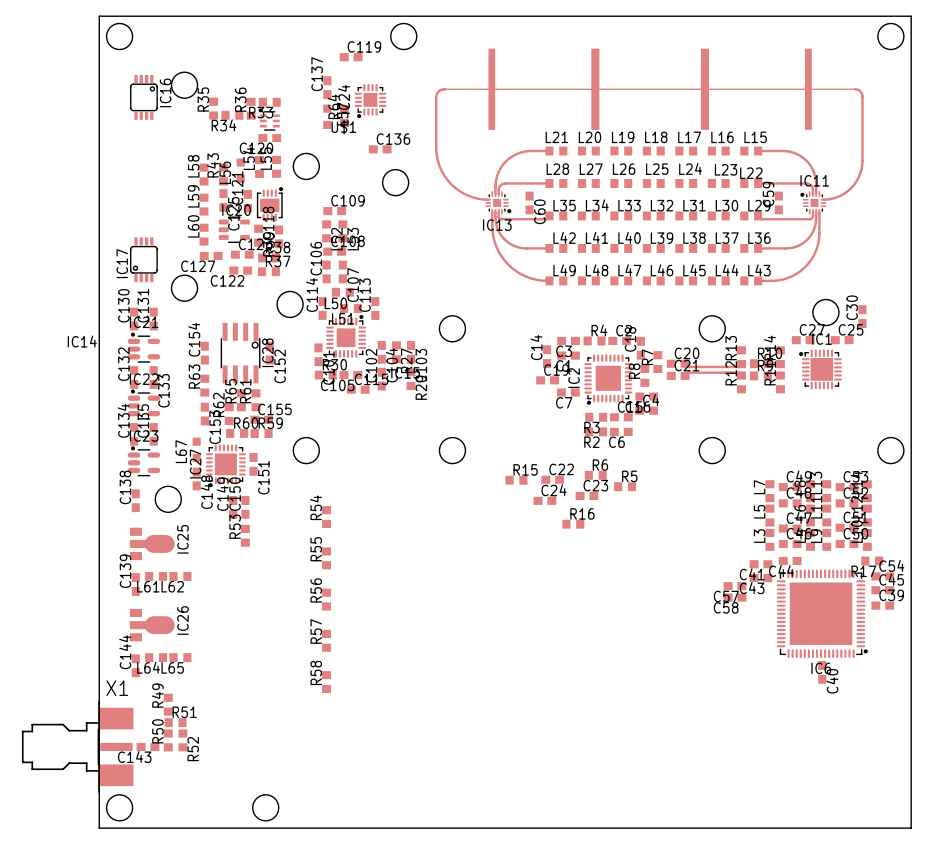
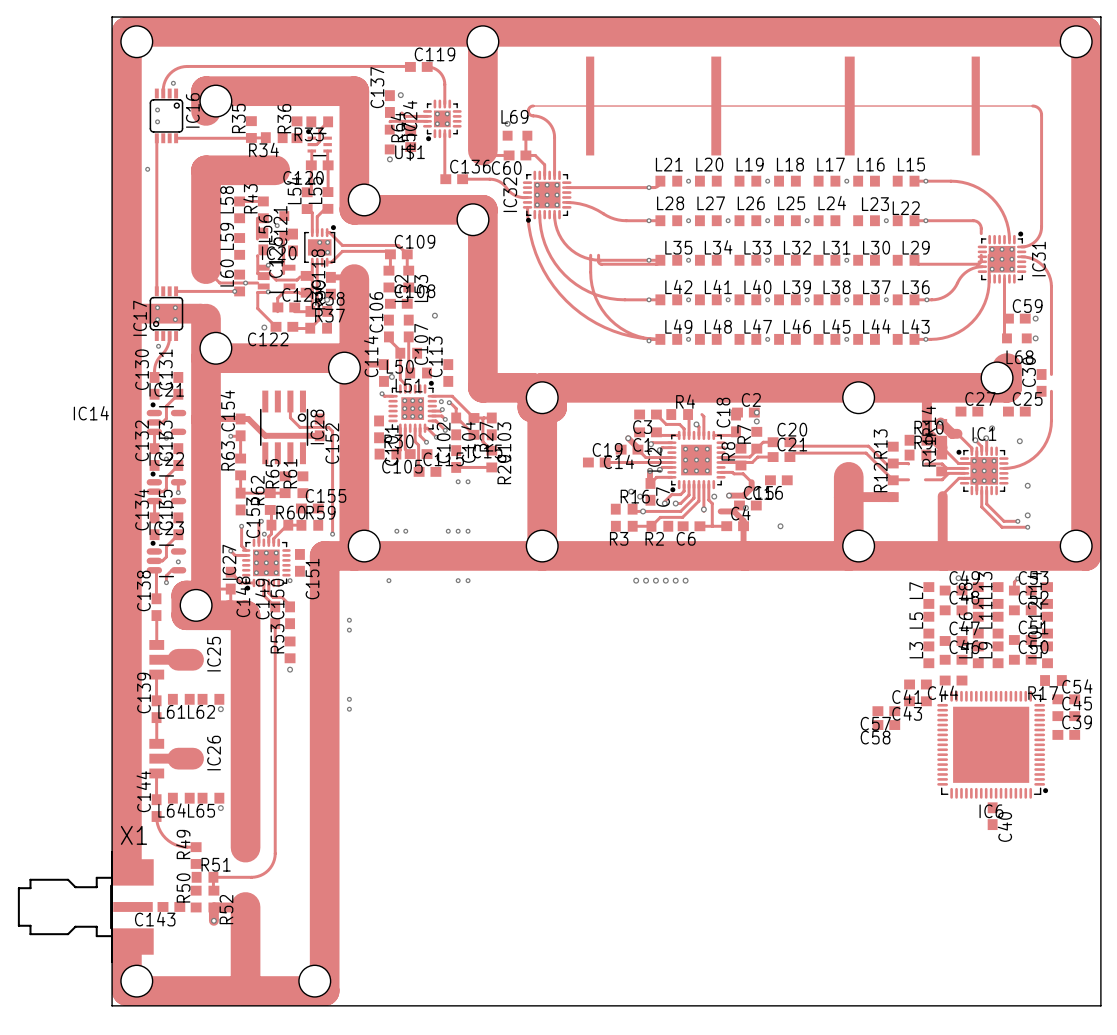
track: none -> (482, 31) (482, 150) (487, 155) (509, 155)
track: none -> (410, 66) (184, 66) (175, 69) (168, 75) (164, 84) (163, 93)
track: none -> (427, 66) (437, 70) (443, 77) (444, 104)
via: none -> (173, 83)
via: none -> (400, 95)
track: (445, 89) (438, 91) (436, 97) (436, 152) (440, 167) (448, 180) (459, 190) (473, 197) (488, 199) -> (533, 106) (528, 109) (529, 113) (546, 120) (553, 131) (554, 175)
via: none -> (157, 109)
track: none -> (206, 110) (206, 91) (354, 91) (354, 209) (482, 209) (482, 387) (532, 387) (532, 407) (552, 407) (552, 387)
track: none -> (401, 112) (405, 116) (427, 116)
via: none -> (437, 113)
via: none -> (447, 113)
track: none -> (427, 121) (389, 121)
via: none -> (157, 121)
track: none -> (328, 121) (319, 130) (319, 141) (316, 144) (311, 144)
via: none -> (437, 123)
via: none -> (447, 123)
via: none -> (507, 123)
track: none -> (444, 133) (445, 179)
L69: none -> (517, 135)
track: none -> (527, 135) (525, 155) (535, 155) (544, 164) (544, 175)
track: none -> (156, 138) (156, 291)
track: none -> (265, 137) (176, 138)
track: none -> (311, 151) (311, 190) (308, 192)
track: none -> (327, 151) (328, 189) (324, 192)
via: none -> (389, 159)
via: none -> (147, 169)
track: none -> (275, 170) (206, 170) (206, 269) (219, 283) (257, 283)
track: none -> (462, 179) (494, 179) (501, 182) (513, 194) (527, 197)
track: (549, 150) (523, 151) (508, 158) (497, 174) (495, 194) -> (660, 181) (659, 185) (654, 187) (566, 187)
via: none -> (688, 181)
via: none -> (767, 181)
via: none -> (846, 181)
via: none -> (925, 181)
track: (782, 150) (797, 154) (808, 163) (815, 176) (816, 194) -> (944, 181) (967, 183) (988, 194) (996, 202) (1004, 217) (1009, 239)
via: none -> (537, 185)
via: none -> (547, 185)
via: none -> (557, 185)
via: none -> (649, 187)
track: (862, 160) (860, 173) (851, 188) (836, 197) (823, 199) -> (1041, 192) (1040, 234) (1031, 244) (1021, 246)
via: none -> (537, 195)
via: none -> (547, 195)
via: none -> (557, 195)
IC32: none -> (547, 196)
track: none -> (235, 200) (257, 201)
L56 position: (240, 170) -> (284, 225)
via: none -> (537, 204)
via: none -> (547, 204)
via: none -> (557, 204)
track: none -> (527, 207) (530, 235) (539, 262) (553, 286) (566, 300) (580, 313) (604, 327) (631, 336) (659, 339)
track: none -> (308, 209) (312, 212) (312, 232)
track: none -> (324, 209) (317, 216) (317, 232)
track: none -> (554, 214) (557, 229) (561, 238) (567, 246) (580, 255) (595, 259) (660, 260)
track: none -> (257, 218) (257, 239)
track: (521, 183) (502, 183) (499, 187) (498, 194) -> (626, 220) (610, 217) (585, 205) (566, 202)
via: none -> (649, 220)
via: none -> (688, 220)
via: none -> (728, 220)
via: none -> (767, 220)
via: none -> (807, 220)
via: none -> (886, 220)
via: none -> (925, 220)
via: none -> (277, 225)
track: none -> (327, 232) (329, 232) (342, 245) (398, 245) (407, 254) (408, 270)
track: none -> (284, 235) (283, 273)
via: none -> (319, 242)
via: none -> (327, 242)
IC13: (498, 202) -> none
C60 rotation: 0° (529, 202) -> 90° clockwise (517, 155)
C60 position: (529, 202) -> (517, 155)
C59 rotation: 0° (778, 202) -> 90° clockwise (1016, 318)
C59 position: (778, 202) -> (1016, 318)
IC11: (813, 202) -> none
via: none -> (992, 249)
via: none -> (1002, 249)
via: none -> (1011, 249)
via: none -> (327, 252)
track: (495, 211) (496, 225) (501, 236) (514, 246) (526, 248) -> (539, 214) (544, 243) (551, 257) (564, 274) (582, 288) (595, 294) (610, 298) (632, 299)
track: (816, 211) (813, 229) (804, 242) (790, 248) (772, 248) -> (982, 266) (973, 268) (965, 273) (947, 295) (931, 299)
track: none -> (257, 255) (257, 273) (269, 273) (276, 280) (297, 280) (300, 276)
IC31: none -> (1002, 257)
track: none -> (1021, 256) (1029, 257) (1039, 262) (1047, 271) (1050, 278) (1051, 374)
via: none -> (649, 260)
via: none -> (688, 260)
via: none -> (767, 260)
via: none -> (846, 260)
via: none -> (992, 259)
via: none -> (1002, 259)
via: none -> (1011, 259)
track: none -> (312, 262) (312, 309) (310, 311) (294, 311)
track: none -> (317, 262) (318, 320) (310, 328) (294, 328)
track: none -> (327, 262) (331, 262) (342, 251) (387, 251) (390, 254) (388, 270)
via: none -> (268, 265)
via: none -> (992, 269)
via: none -> (1002, 269)
via: none -> (1011, 269)
track: none -> (330, 277) (352, 277) (354, 279) (354, 555)
track: none -> (1004, 278) (1004, 335) (1006, 338)
via: none -> (245, 283)
track: none -> (176, 291) (234, 291)
via: none -> (234, 291)
track: none -> (268, 291) (257, 292) (257, 308) (277, 328)
via: none -> (268, 291)
track: none -> (300, 293) (283, 292) (277, 298) (277, 311)
via: none -> (327, 299)
via: none -> (649, 299)
via: none -> (688, 299)
via: none -> (728, 299)
via: none -> (767, 299)
via: none -> (807, 299)
via: none -> (846, 299)
via: none -> (886, 299)
via: none -> (926, 299)
via: none -> (157, 307)
via: none -> (175, 307)
C127: (211, 255) -> none
track: none -> (126, 313) (201, 313) (206, 318) (206, 615)
via: none -> (434, 315)
via: none -> (1035, 318)
via: none -> (157, 319)
via: none -> (175, 319)
via: none -> (264, 327)
track: none -> (169, 336) (166, 348) (155, 364) (154, 377)
track: none -> (388, 336) (388, 339) (400, 350) (400, 379) (405, 384) (405, 388)
track: none -> (408, 336) (410, 374)
via: none -> (688, 339)
via: none -> (767, 339)
via: none -> (846, 339)
via: none -> (925, 339)
L68: none -> (1016, 338)
via: none -> (1035, 338)
via: none -> (649, 340)
via: none -> (158, 346)
track: none -> (206, 358) (354, 358) (360, 364) (384, 364)
track: none -> (1006, 368) (1006, 387) (542, 387) (542, 555)
via: none -> (391, 376)
track: none -> (926, 387) (926, 431) (958, 463) (971, 463) (976, 458) (976, 451)
track: none -> (1051, 391) (1051, 426) (1044, 446) (1037, 454) (1024, 463) (1003, 468)
track: none -> (178, 394) (166, 406) (166, 418) (162, 422) (154, 422)
track: none -> (382, 393) (384, 396) (393, 396)
via: none -> (382, 393)
track: none -> (432, 396) (452, 396) (473, 417) (491, 417)
track: none -> (290, 401) (290, 417) (299, 427) (328, 427) (332, 431) (332, 534)
via: none -> (404, 400)
via: none -> (412, 400)
via: none -> (420, 400)
via: none -> (441, 401)
track: none -> (449, 402) (456, 408) (456, 417) (473, 434)
via: none -> (449, 402)
via: none -> (404, 408)
via: none -> (412, 408)
via: none -> (420, 408)
track: none -> (442, 409) (432, 411)
via: none -> (442, 409)
C3 position: (568, 340) -> (648, 414)
R4 position: (594, 340) -> (679, 414)
via: none -> (756, 412)
track: none -> (656, 414) (666, 424) (679, 424) (684, 428) (684, 435)
track: none -> (688, 414) (689, 435)
track: none -> (701, 414) (703, 416) (703, 435)
track: none -> (432, 416) (441, 416) (445, 419)
via: none -> (404, 416)
via: none -> (412, 416)
via: none -> (420, 416)
track: none -> (483, 417) (482, 441) (491, 450)
track: none -> (206, 419) (248, 418) (265, 435) (319, 435)
via: none -> (445, 419)
track: none -> (432, 420) (435, 420) (445, 430)
C14 name position: C14 (536, 347) -> C14 (619, 461)
via: none -> (756, 421)
C18 position: (640, 348) -> (736, 423)
track: none -> (940, 422) (952, 433) (957, 433) (971, 448) (971, 451)
via: none -> (940, 422)
track: none -> (696, 424) (698, 426) (698, 435)
via: none -> (696, 424)
track: none -> (400, 428) (400, 450) (396, 454)
track: none -> (405, 428) (405, 449) (410, 454)
track: none -> (415, 428) (415, 441) (418, 445) (419, 471)
track: none -> (420, 428) (420, 435) (426, 442)
track: none -> (425, 428) (436, 437)
via: none -> (992, 428)
via: none -> (445, 430)
C1 position: (568, 355) -> (648, 432)
track: none -> (154, 431) (154, 448)
C14 rotation: 0° (547, 356) -> 90° clockwise (629, 449)
C14 position: (547, 356) -> (629, 449)
track: none -> (656, 432) (659, 435) (679, 435)
R13 position: (741, 357) -> (893, 455)
track: none -> (713, 435) (732, 435)
track: none -> (230, 436) (240, 435) (240, 458)
via: none -> (230, 436)
via: none -> (436, 437)
via: none -> (166, 438)
track: none -> (628, 438) (645, 457) (671, 457)
via: none -> (628, 438)
R7 position: (657, 362) -> (756, 440)
track: none -> (986, 438) (986, 451)
via: none -> (986, 438)
C20 position: (678, 363) -> (781, 442)
track: (685, 363) (688, 366) (738, 366) (741, 364) -> none
track: none -> (975, 440) (981, 446) (981, 451)
via: none -> (975, 440)
via: none -> (1019, 441)
via: none -> (426, 442)
track: none -> (671, 442) (650, 444)
track: none -> (773, 442) (763, 442) (749, 457) (721, 457)
track: none -> (789, 442) (793, 446) (868, 446) (886, 463) (908, 463)
via: none -> (650, 444)
track: none -> (671, 447) (662, 447) (659, 450)
IC1 position: (820, 369) -> (982, 470)
via: none -> (659, 450)
via: none -> (685, 449)
via: none -> (696, 449)
via: none -> (707, 449)
R8 position: (644, 375) -> (740, 457)
C21 position: (678, 375) -> (781, 457)
track: (741, 375) (738, 372) (688, 372) (685, 375) -> none
track: none -> (773, 457) (757, 457) (752, 462) (721, 462)
track: none -> (789, 457) (793, 453) (866, 453) (893, 480) (908, 479)
via: none -> (166, 459)
via: none -> (685, 460)
via: none -> (696, 460)
via: none -> (707, 460)
IC2 position: (608, 379) -> (696, 461)
C19 position: (547, 380) -> (596, 462)
via: none -> (974, 461)
via: none -> (984, 461)
via: none -> (994, 461)
track: none -> (605, 462) (671, 462)
R12 position: (741, 382) -> (893, 488)
track: none -> (925, 463) (942, 463) (946, 468) (964, 468)
track: none -> (178, 465) (166, 477) (166, 488) (163, 491) (154, 491)
track: none -> (456, 467) (491, 467)
track: none -> (671, 467) (662, 467) (659, 469)
track: none -> (650, 470) (650, 483) (656, 477) (671, 477)
via: none -> (650, 470)
via: none -> (659, 469)
via: none -> (685, 470)
via: none -> (696, 470)
via: none -> (707, 470)
via: none -> (974, 470)
via: none -> (984, 470)
via: none -> (994, 470)
C133 name position: C133 (163, 390) -> C133 (165, 440)
track: none -> (721, 472) (743, 473) (751, 482) (751, 487) (743, 495) (729, 495)
track: none -> (964, 473) (948, 473) (942, 479) (925, 479)
track: none -> (240, 475) (240, 493) (285, 493)
C7 rotation: 0° (568, 392) -> 90° clockwise (650, 491)
C7 position: (568, 392) -> (650, 491)
track: none -> (848, 476) (848, 555)
via: none -> (974, 480)
via: none -> (984, 480)
via: none -> (994, 480)
via: none -> (458, 481)
via: none -> (468, 481)
track: none -> (178, 482) (178, 492)
track: none -> (684, 484) (684, 491) (680, 494) (671, 494) (664, 503)
track: none -> (689, 484) (689, 495) (680, 503) (675, 503)
track: none -> (694, 484) (694, 498) (680, 511) (634, 511) (632, 509)
track: none -> (698, 484) (698, 501) (682, 517) (660, 517) (651, 526) (632, 526)
track: none -> (703, 484) (703, 511)
track: none -> (708, 484) (708, 500) (712, 503) (712, 526)
via: none -> (1027, 485)
C7 name position: C7 (564, 402) -> C7 (663, 497)
track: none -> (976, 490) (976, 483) (971, 478) (959, 478) (942, 494) (943, 555)
track: none -> (981, 490) (981, 506) (1002, 527) (1027, 527)
track: none -> (986, 490) (986, 504) (1004, 521) (1017, 521)
via: none -> (631, 491)
via: none -> (178, 492)
via: none -> (640, 496)
via: none -> (714, 496)
via: none -> (729, 495)
C4 position: (646, 410) -> (735, 526)
track: none -> (893, 497) (848, 497)
track: none -> (154, 501) (154, 517)
via: none -> (664, 503)
via: none -> (675, 503)
R3 position: (596, 417) -> (624, 526)
via: none -> (745, 507)
track: none -> (270, 509) (271, 533) (268, 536) (268, 542)
via: none -> (703, 509)
via: none -> (643, 511)
track: none -> (720, 511) (734, 511) (743, 520) (744, 555)
via: none -> (1027, 515)
track: none -> (261, 521) (258, 523) (258, 542)
via: none -> (261, 521)
via: none -> (1017, 521)
R2 position: (596, 431) -> (659, 526)
C6 position: (621, 431) -> (691, 526)
track: none -> (301, 525) (287, 525) (273, 538) (273, 542)
track: none -> (241, 526) (241, 545) (246, 550)
via: none -> (241, 526)
track: none -> (699, 526) (726, 526)
via: none -> (780, 526)
via: none -> (1027, 527)
via: none -> (396, 531)
via: none -> (405, 531)
via: none -> (448, 531)
via: none -> (458, 531)
via: none -> (468, 531)
via: none -> (264, 534)
via: none -> (332, 534)
track: none -> (178, 534) (166, 546) (166, 556) (162, 560) (154, 560)
L67: (196, 449) -> none
track: none -> (230, 550) (235, 555) (246, 555)
via: none -> (230, 550)
via: none -> (256, 552)
via: none -> (266, 552)
via: none -> (276, 552)
via: none -> (178, 561)
via: none -> (256, 562)
via: none -> (266, 562)
via: none -> (276, 562)
track: none -> (154, 570) (156, 572) (156, 598)
track: none -> (178, 570) (171, 570) (166, 575) (166, 582)
track: none -> (230, 572) (241, 582) (253, 582)
via: none -> (256, 572)
via: none -> (266, 572)
via: none -> (276, 572)
R6: (595, 475) -> none
via: none -> (958, 578)
track: none -> (1017, 578) (1014, 582) (1014, 590)
via: none -> (1017, 578)
via: none -> (290, 580)
via: none -> (388, 580)
via: none -> (458, 580)
via: none -> (468, 580)
via: none -> (636, 580)
via: none -> (646, 580)
via: none -> (655, 580)
C22: (552, 479) -> none
via: none -> (665, 580)
via: none -> (675, 580)
via: none -> (685, 580)
via: none -> (166, 582)
track: none -> (263, 582) (263, 595) (275, 606)
track: none -> (268, 582) (268, 593) (273, 597) (282, 597) (290, 606)
R15: (516, 480) -> none
R5: (625, 486) -> none
C23: (586, 495) -> none
C24: (544, 500) -> none
track: none -> (156, 615) (156, 644)
track: none -> (229, 615) (230, 614) (230, 589) (212, 589) (206, 595) (186, 595) (186, 615) (245, 615) (245, 847)
via: none -> (349, 620)
track: none -> (275, 623) (274, 859) (268, 870) (257, 876) (213, 877) (213, 890)
R54: (326, 517) -> none
via: none -> (349, 630)
R16 position: (573, 524) -> (624, 509)
via: none -> (290, 669)
track: none -> (156, 674) (156, 700)
R55: (326, 558) -> none
via: none -> (349, 699)
via: none -> (220, 709)
via: none -> (349, 709)
track: none -> (156, 717) (156, 743)
R56: (326, 599) -> none
track: none -> (156, 773) (156, 799)
R57: (326, 640) -> none
via: none -> (220, 808)
track: none -> (156, 816) (158, 828) (168, 840) (179, 846) (196, 847)
R58: (326, 682) -> none
track: none -> (126, 867) (126, 31) (1086, 31) (1086, 555) (324, 555) (324, 991) (126, 991) (126, 946)
track: none -> (213, 920) (213, 907) (245, 906) (245, 991)
via: none -> (213, 920)

